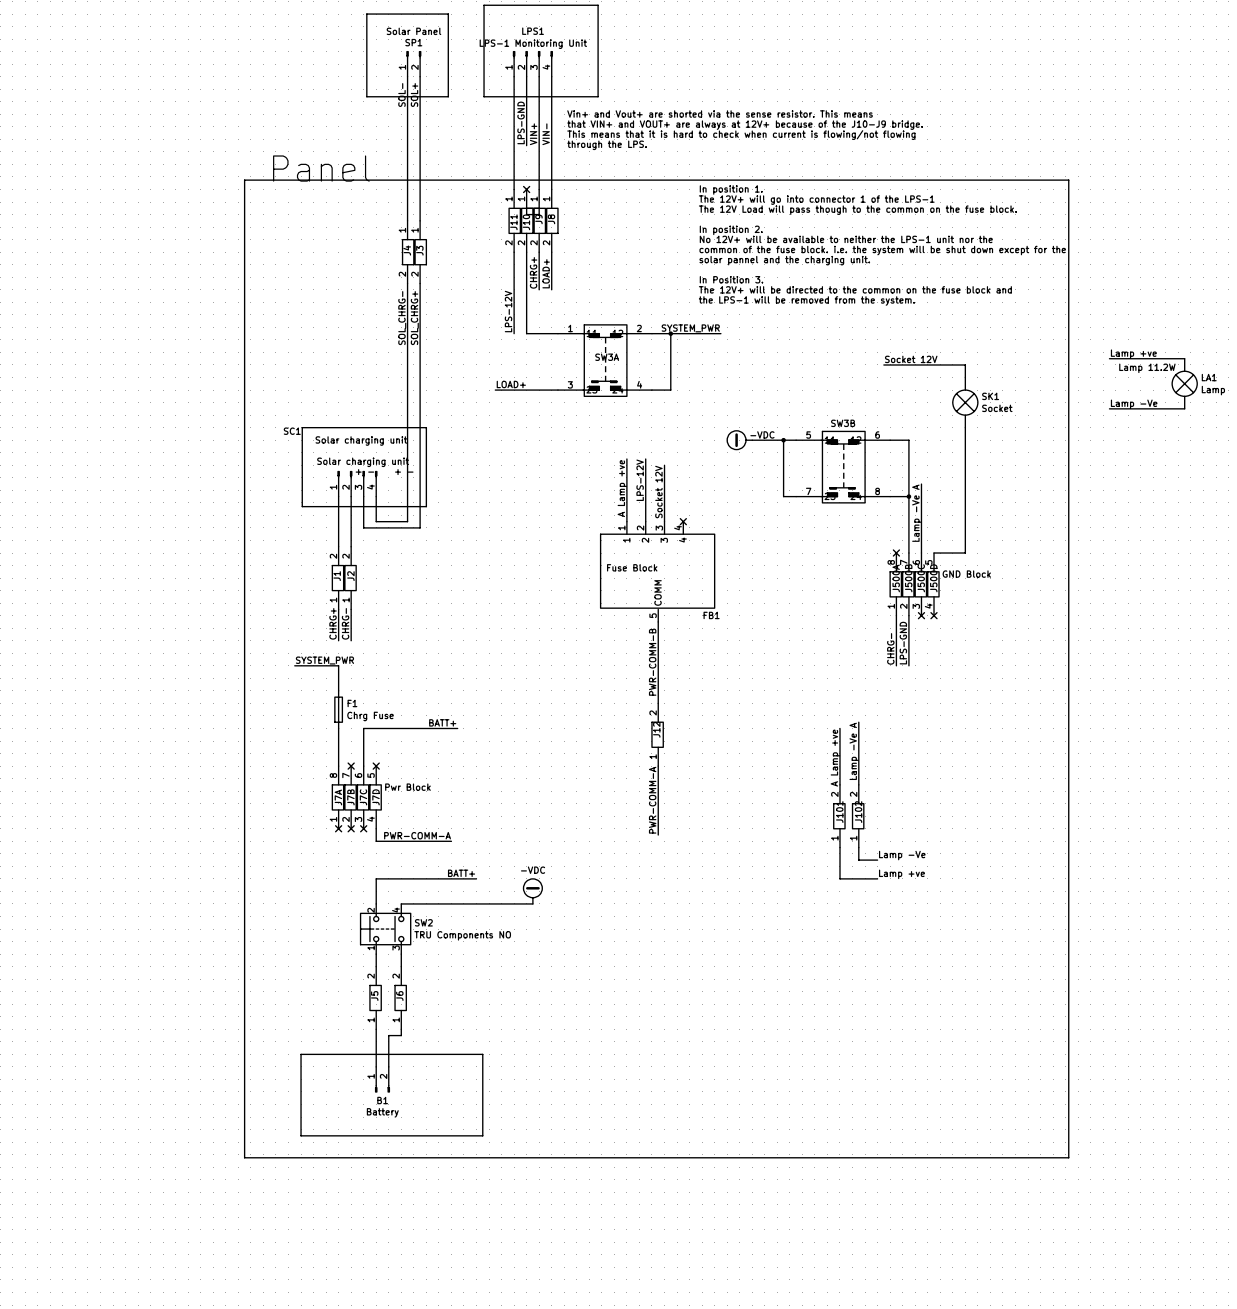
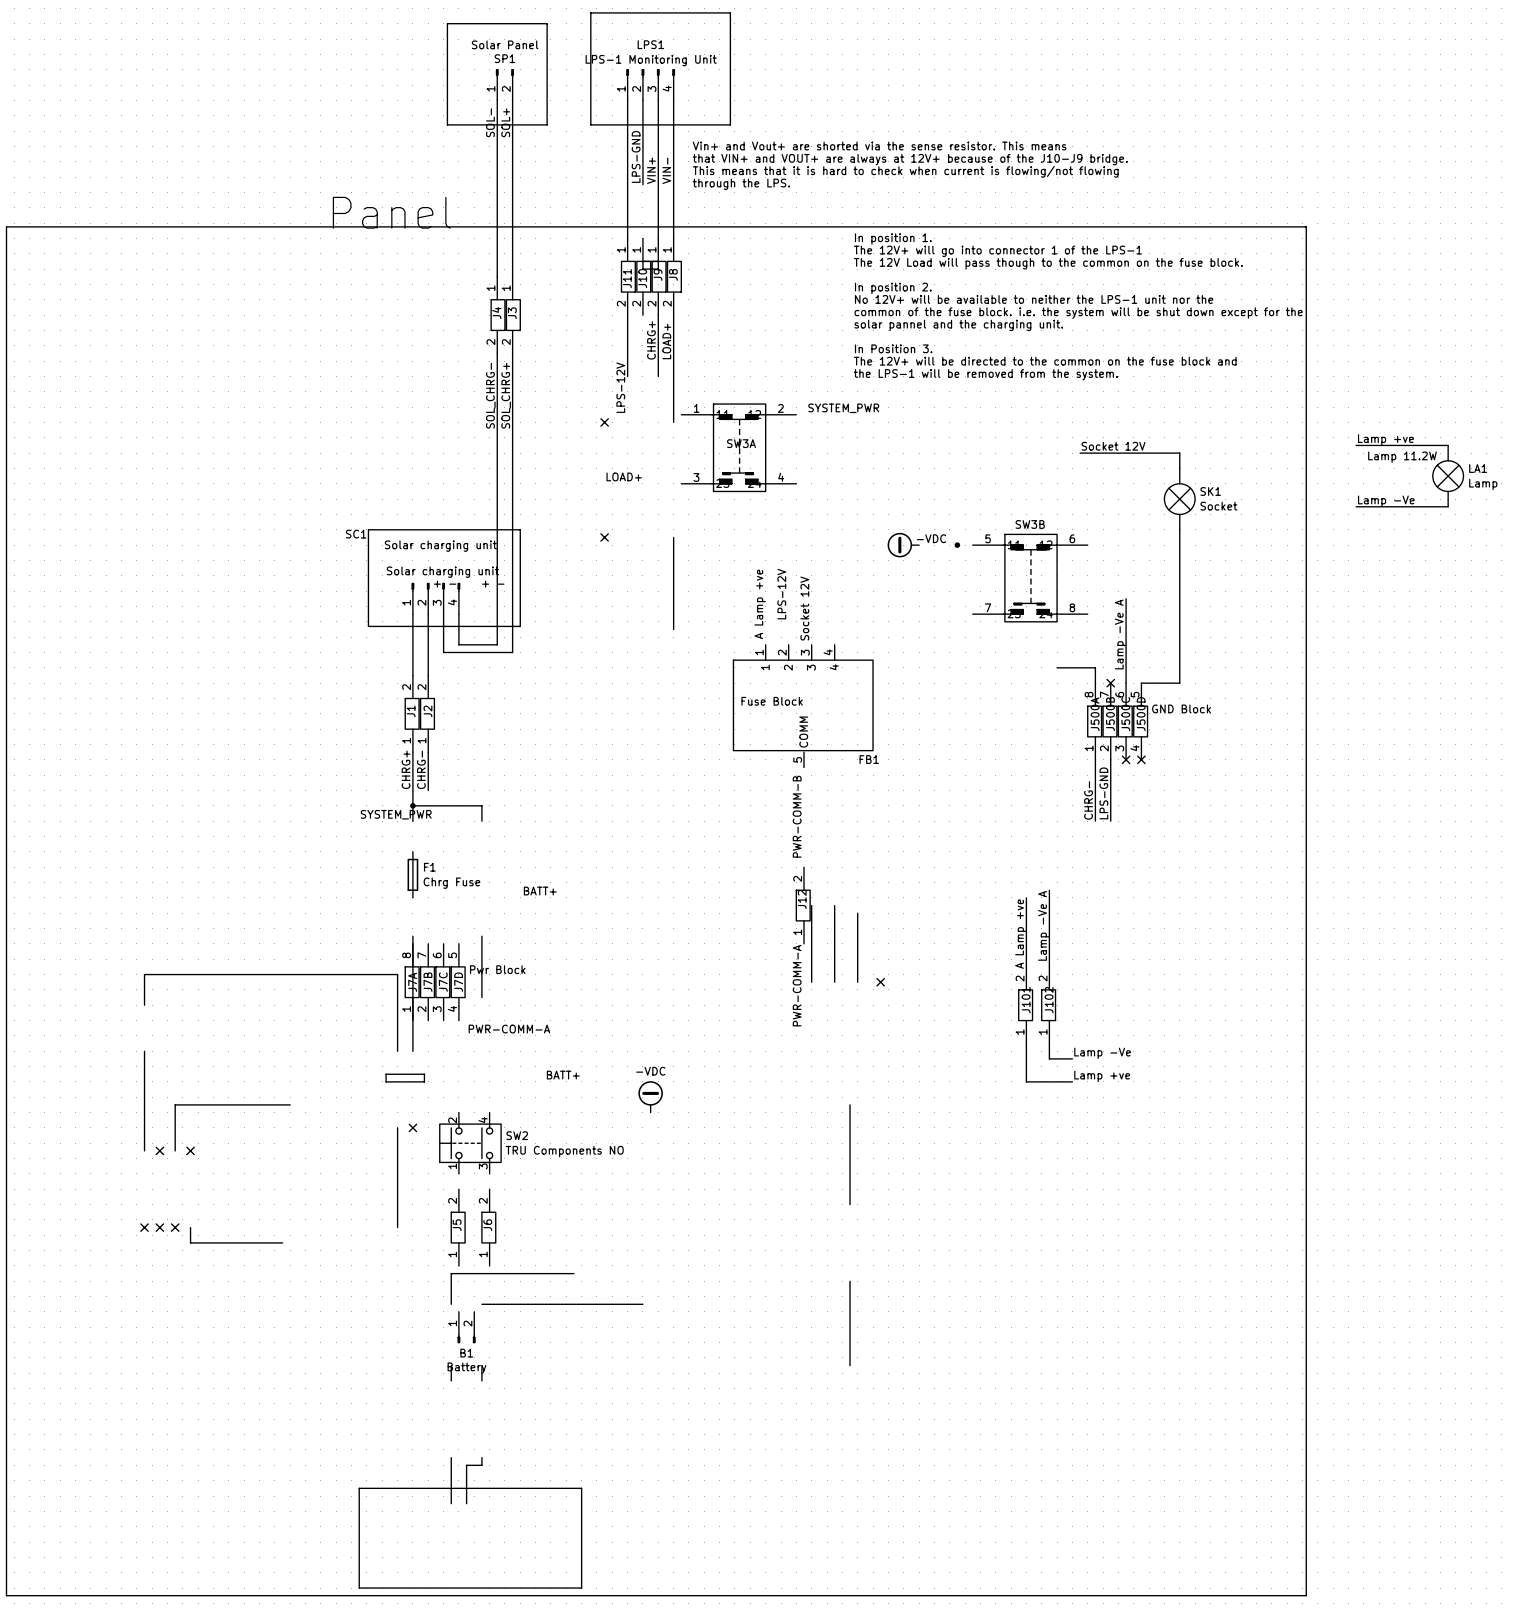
line: (244, 180) (244, 1157) (1068, 1157) -> (297, 226) (6, 226) (6, 1595) (1306, 1595) (1306, 1423)
no-connect mark: (526, 189) -> none
wire: (526, 252) (526, 333) (557, 333) -> none
wire: none -> (658, 361) (658, 376)
wire: none -> (673, 361) (673, 422)
wire: (514, 302) (514, 333) -> none
wire: (651, 333) (720, 333) -> none
wire: (670, 333) (670, 390) (651, 390) -> none
junction: (670, 333) -> none
no-connect mark: none -> (604, 422)
wire: (495, 390) (557, 390) -> none
no-connect mark: none -> (604, 537)
wire: none -> (673, 537) (673, 629)
wire: (752, 440) (796, 440) -> none
wire: (783, 440) (783, 496) (796, 496) -> none
wire: (890, 440) (908, 440) (908, 553) -> none
wire: (626, 459) (626, 521) -> none
wire: (645, 459) (645, 521) -> none
wire: (664, 465) (664, 521) -> none
wire: (890, 496) (908, 496) -> none
junction: (908, 496) -> none
no-connect mark: (683, 521) -> none
wire: none -> (1057, 667) (1095, 667) (1095, 683)
no-connect mark position: (896, 553) -> (1110, 683)
wire: (658, 621) (658, 703) -> none
wire: none -> (412, 790) (412, 821)
wire: none -> (412, 805) (481, 805) (481, 821)
junction: none -> (412, 805)
wire: (294, 665) (338, 665) (338, 690) -> none
wire: (338, 728) (338, 759) -> none
wire: (457, 728) (363, 728) (363, 766) -> none
wire: none -> (811, 905) (811, 982)
wire: none -> (834, 905) (834, 982)
wire: none -> (857, 913) (857, 982)
wire: none -> (481, 936) (481, 997)
wire: none -> (412, 943) (412, 1051)
no-connect mark: (351, 766) -> none
no-connect mark: (376, 766) -> none
wire: (658, 766) (658, 835) -> none
no-connect mark: none -> (880, 982)
wire: none -> (144, 1005) (144, 974) (397, 974) (397, 1051)
no-connect mark: (338, 828) -> none
no-connect mark: (351, 828) -> none
no-connect mark: (363, 828) -> none
wire: (376, 828) (376, 841) (451, 841) -> none
wire: none -> (144, 1051) (144, 1150)
line: none -> (386, 1074) (424, 1074) (424, 1081) (386, 1081) (386, 1074)
wire: (476, 878) (376, 878) (376, 903) -> none
wire: none -> (290, 1104) (175, 1104) (175, 1150)
wire: none -> (850, 1104) (850, 1204)
wire: (401, 903) (532, 903) -> none
wire: none -> (397, 1127) (397, 1227)
no-connect mark: none -> (412, 1127)
no-connect mark: none -> (159, 1150)
no-connect mark: none -> (190, 1150)
wire: (376, 954) (376, 966) -> none
wire: (401, 954) (401, 966) -> none
no-connect mark: none -> (144, 1227)
no-connect mark: none -> (159, 1227)
no-connect mark: none -> (175, 1227)
wire: none -> (190, 1227) (190, 1242) (282, 1242)
wire: (376, 1029) (376, 1066) -> none
wire: (401, 1029) (401, 1035) -> (573, 1273) (489, 1273)
wire: (388, 1035) (388, 1066) -> (474, 1273) (451, 1273) (451, 1304)
wire: none -> (850, 1281) (850, 1365)
line: (301, 1054) (482, 1054) (482, 1135) (301, 1135) (301, 1054) -> none
wire: none -> (481, 1304) (642, 1304)
wire: none -> (451, 1365) (451, 1380)
wire: none -> (481, 1365) (481, 1380)
wire: none -> (451, 1457) (451, 1503)
wire: none -> (481, 1457) (481, 1465) (466, 1465) (466, 1503)
line: none -> (359, 1488) (581, 1488) (581, 1588) (359, 1588) (359, 1488)

